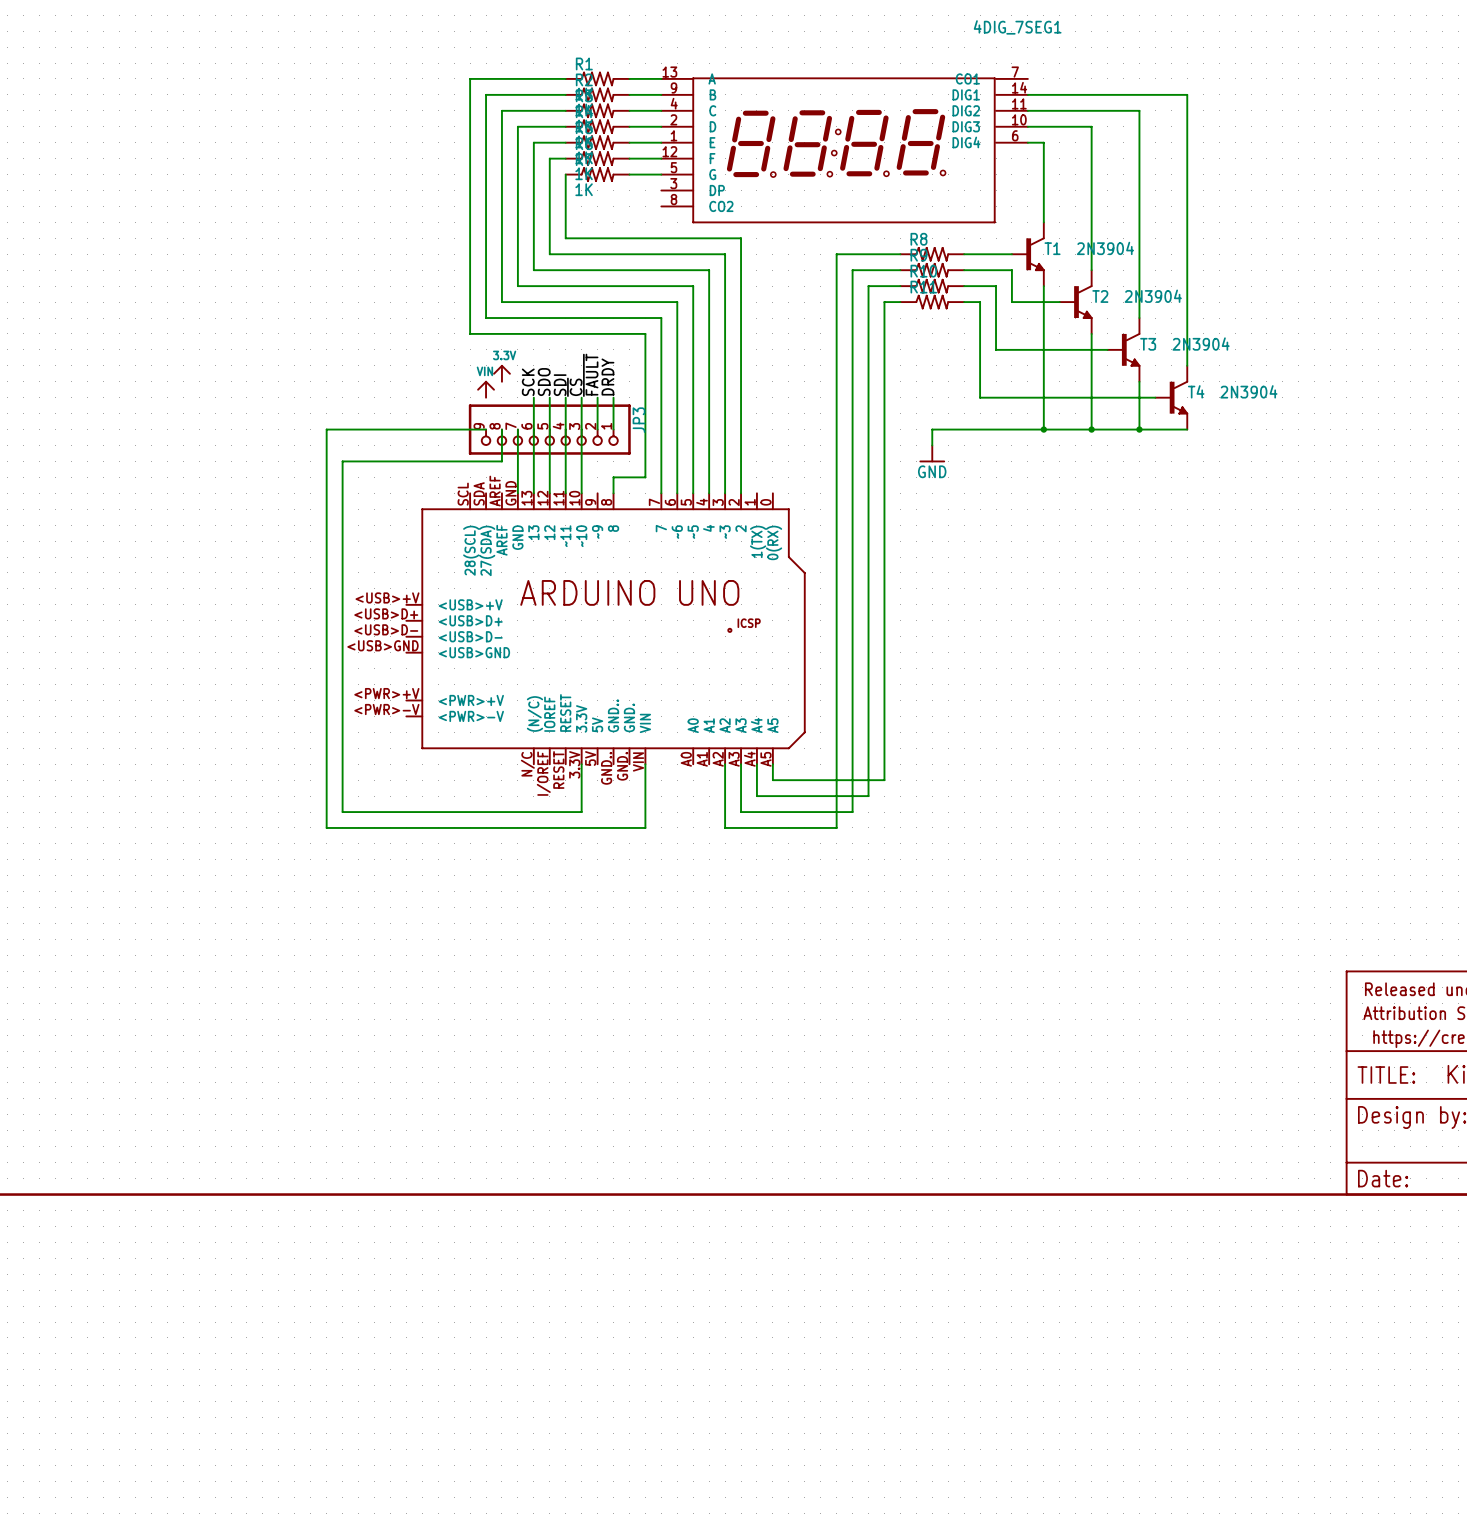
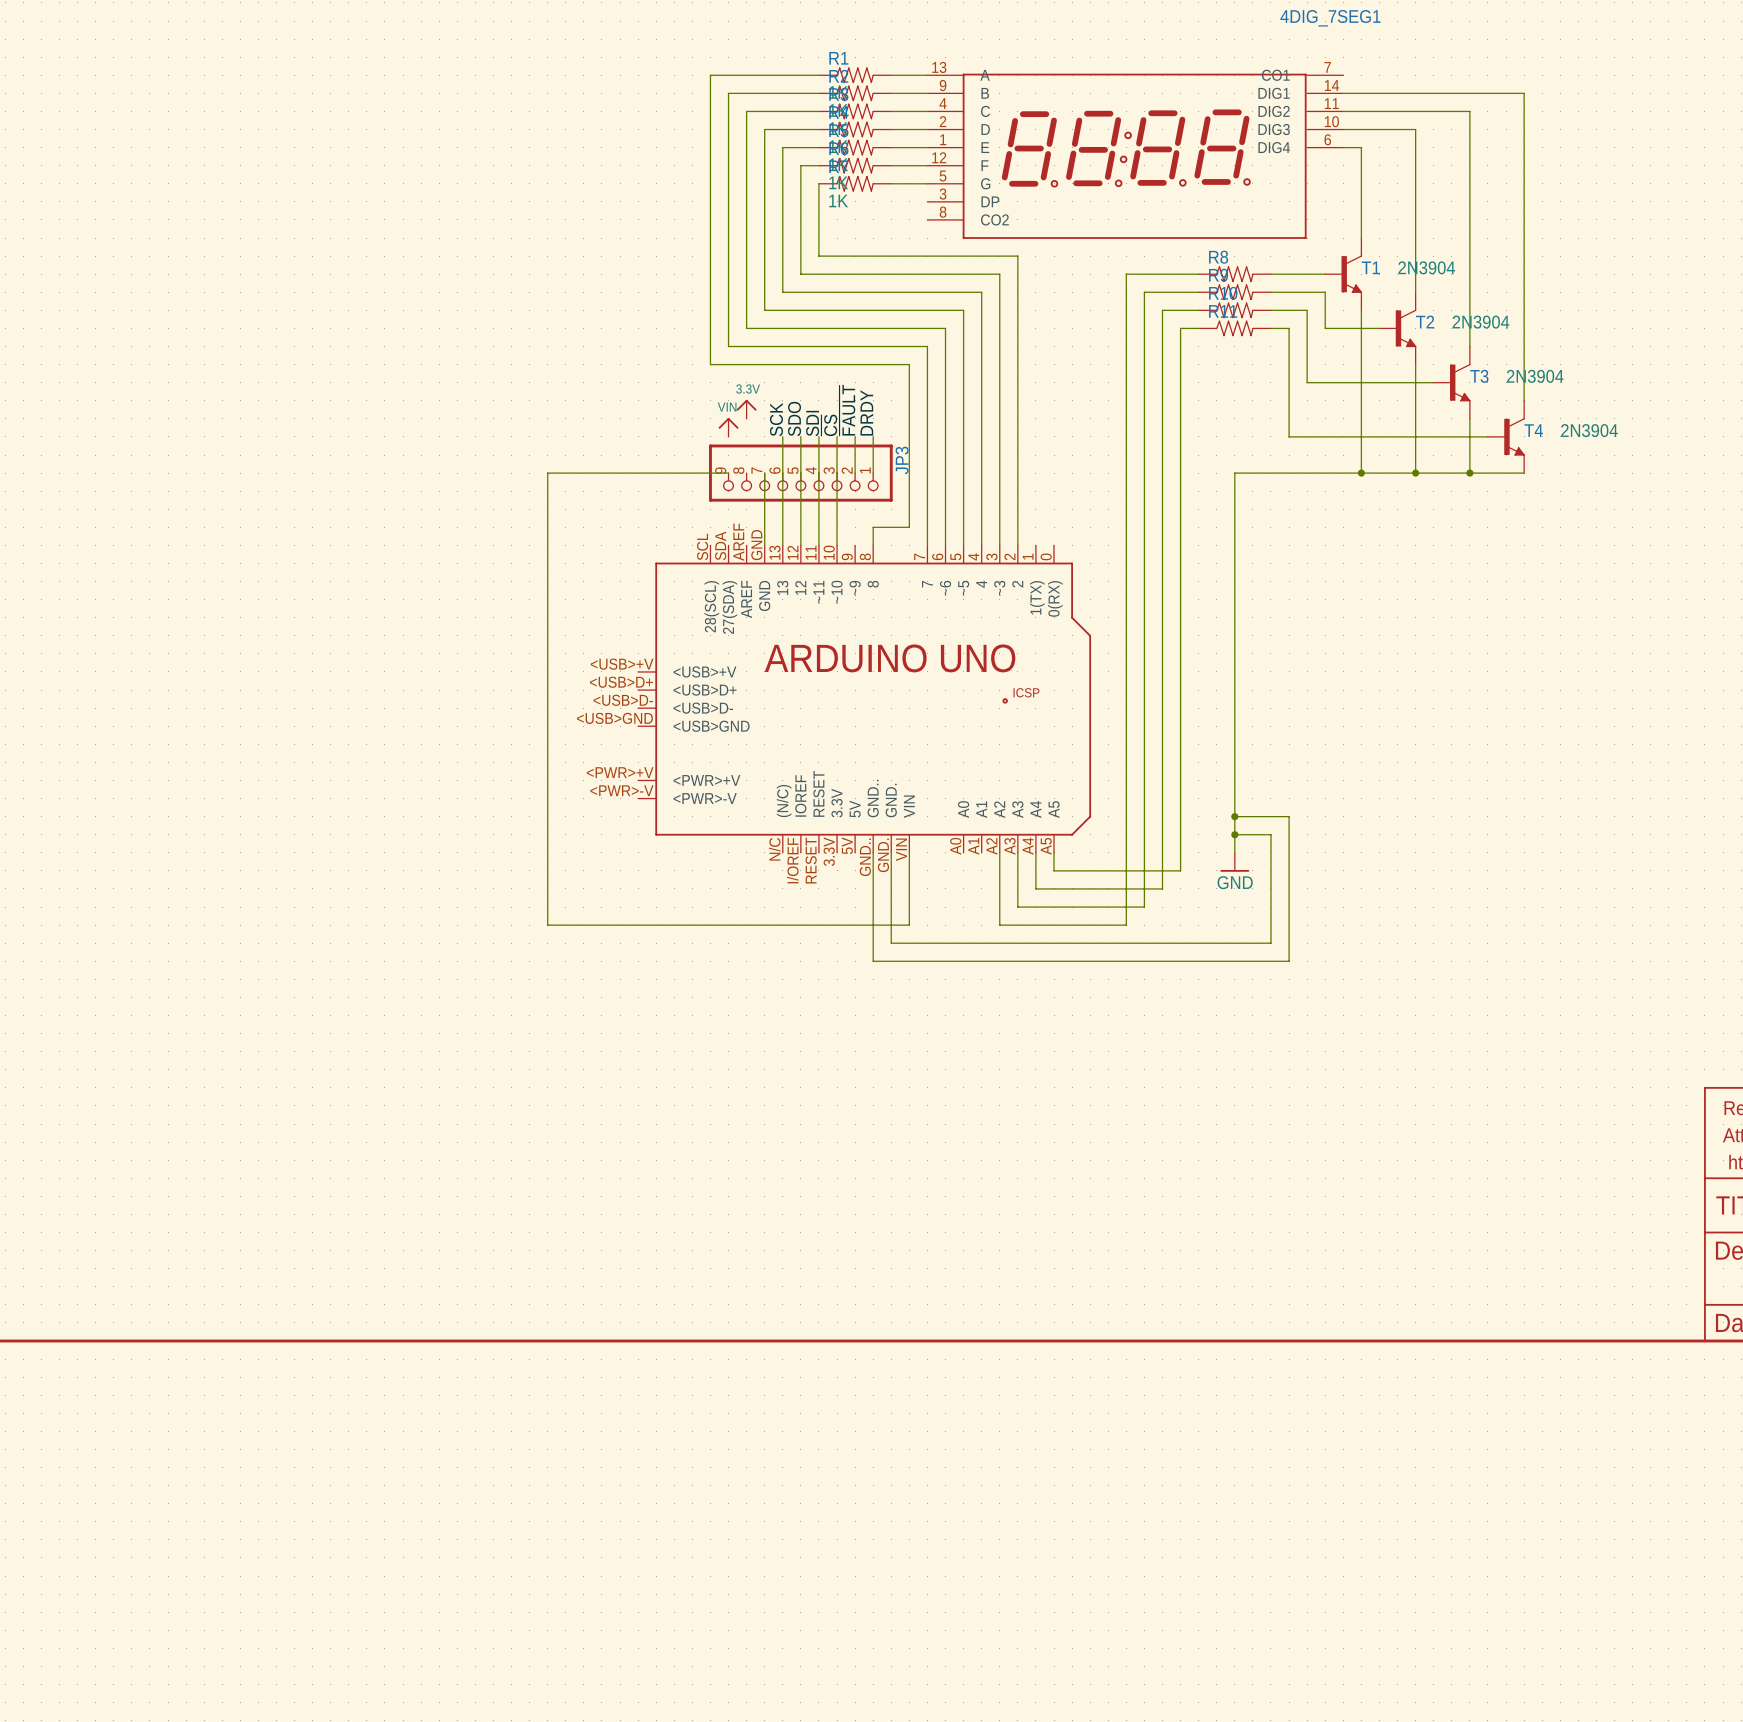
wire: (501, 429) (501, 461) (342, 461) (342, 812) (581, 812) (581, 764) -> none
wire: none -> (1234, 491) (1234, 852)
power symbol: GND (932, 453) -> none
wire: none -> (1234, 816) (1289, 816) (1289, 961) (873, 961) (873, 852)
junction: none -> (1234, 816)
wire: none -> (1234, 834) (1270, 834) (1270, 943) (891, 943) (891, 852)
junction: none -> (1234, 834)
power symbol: none -> GND (1234, 862)

